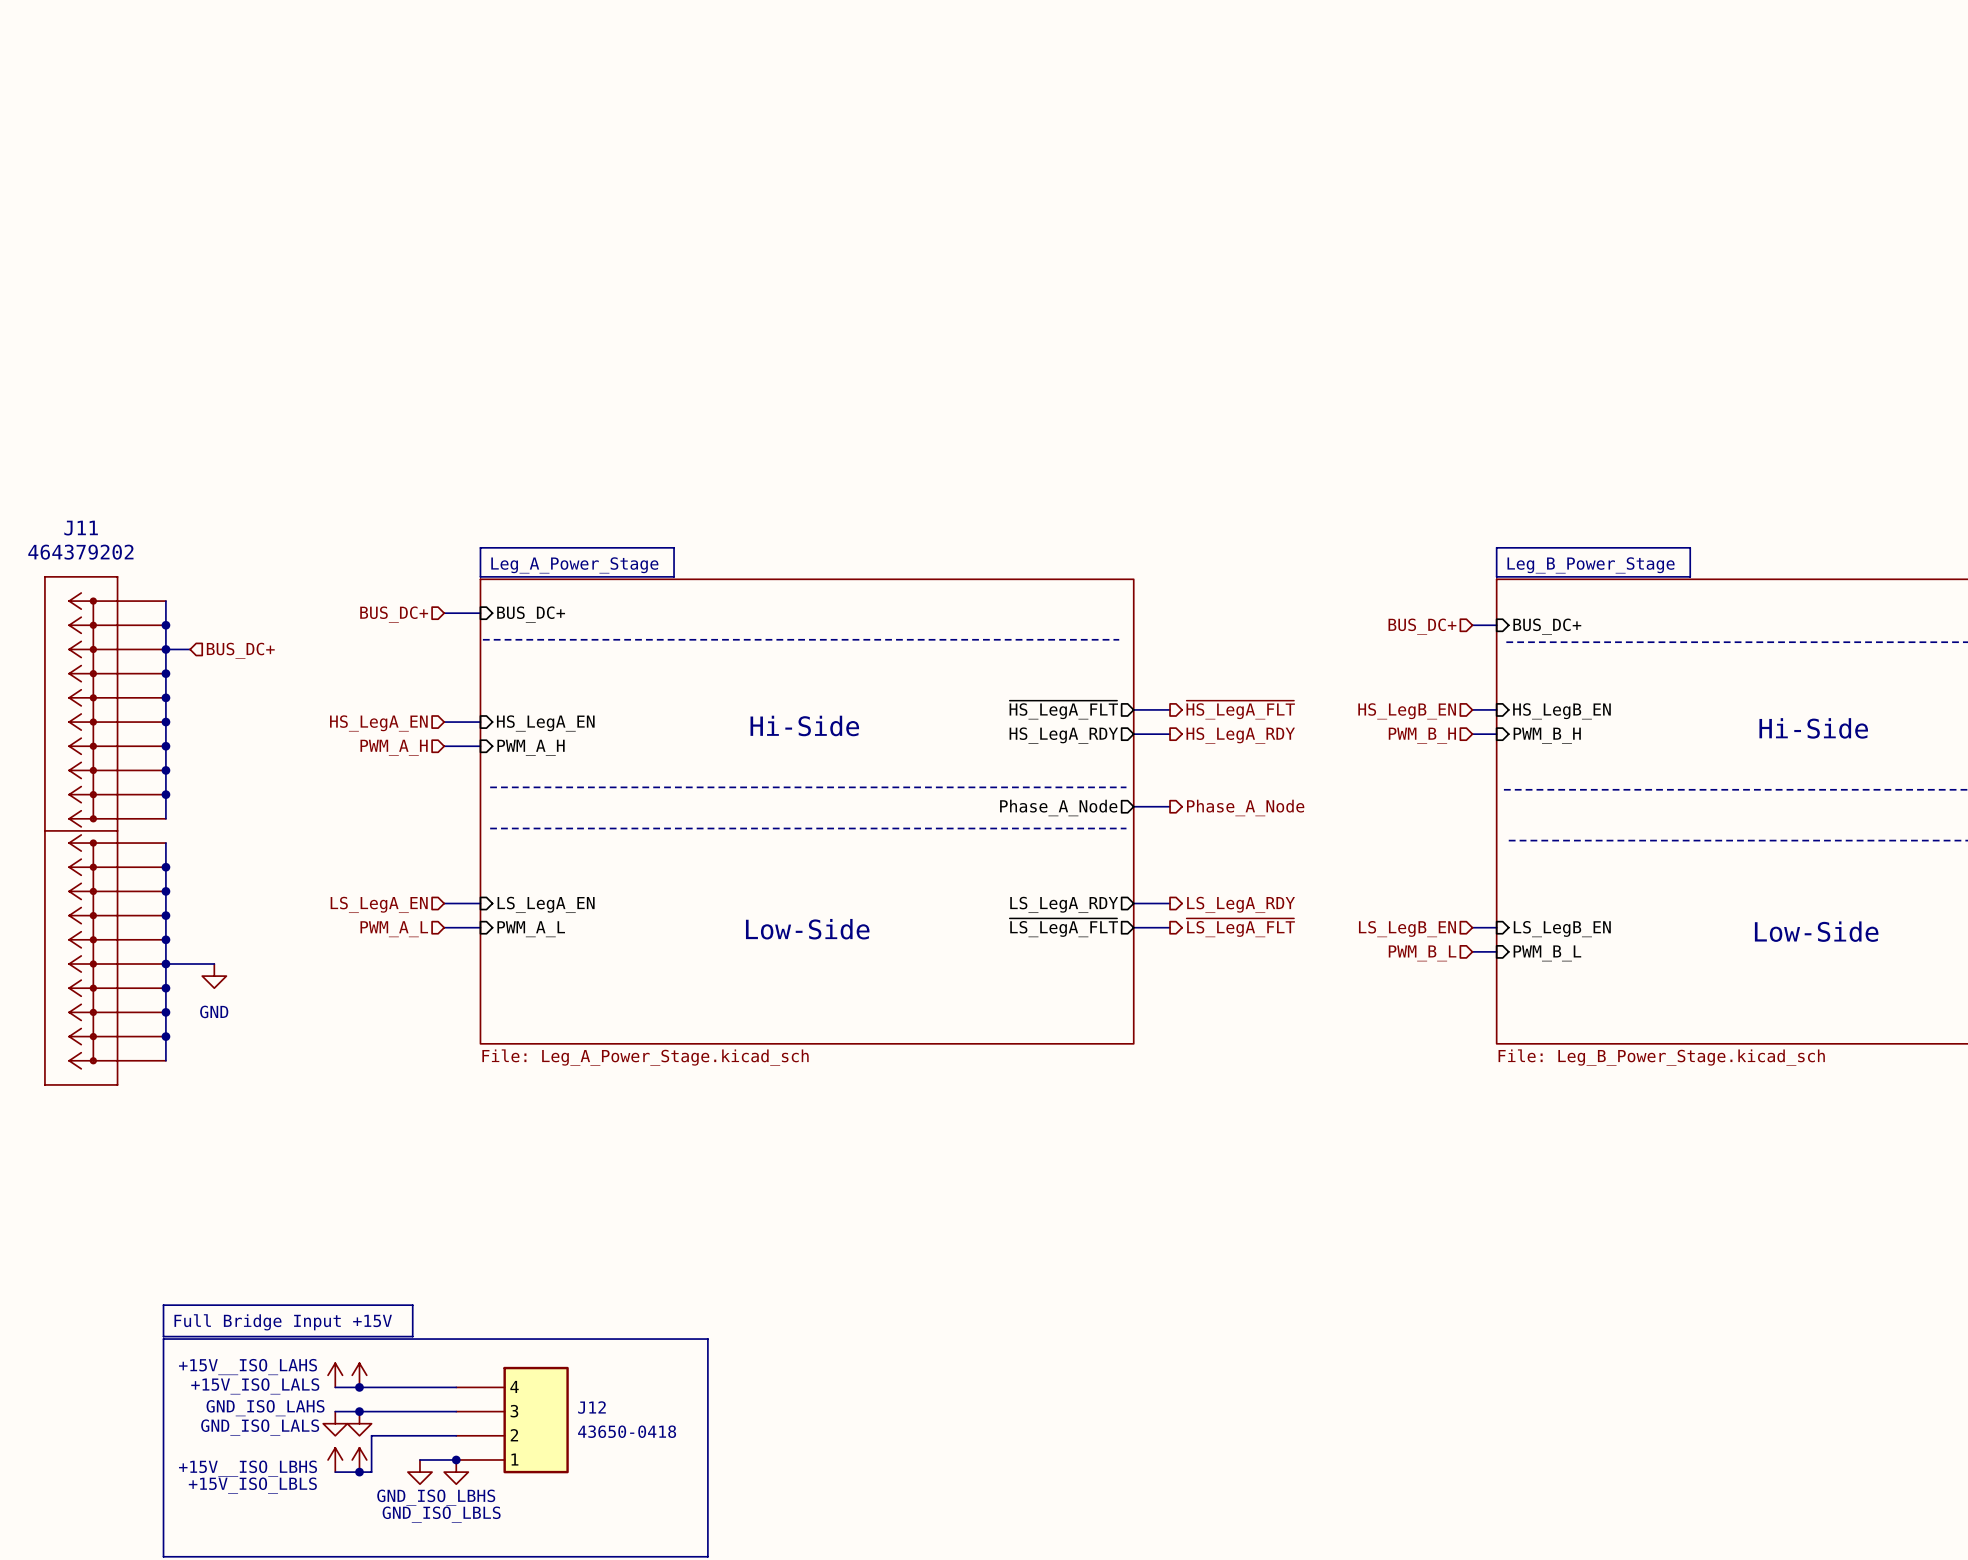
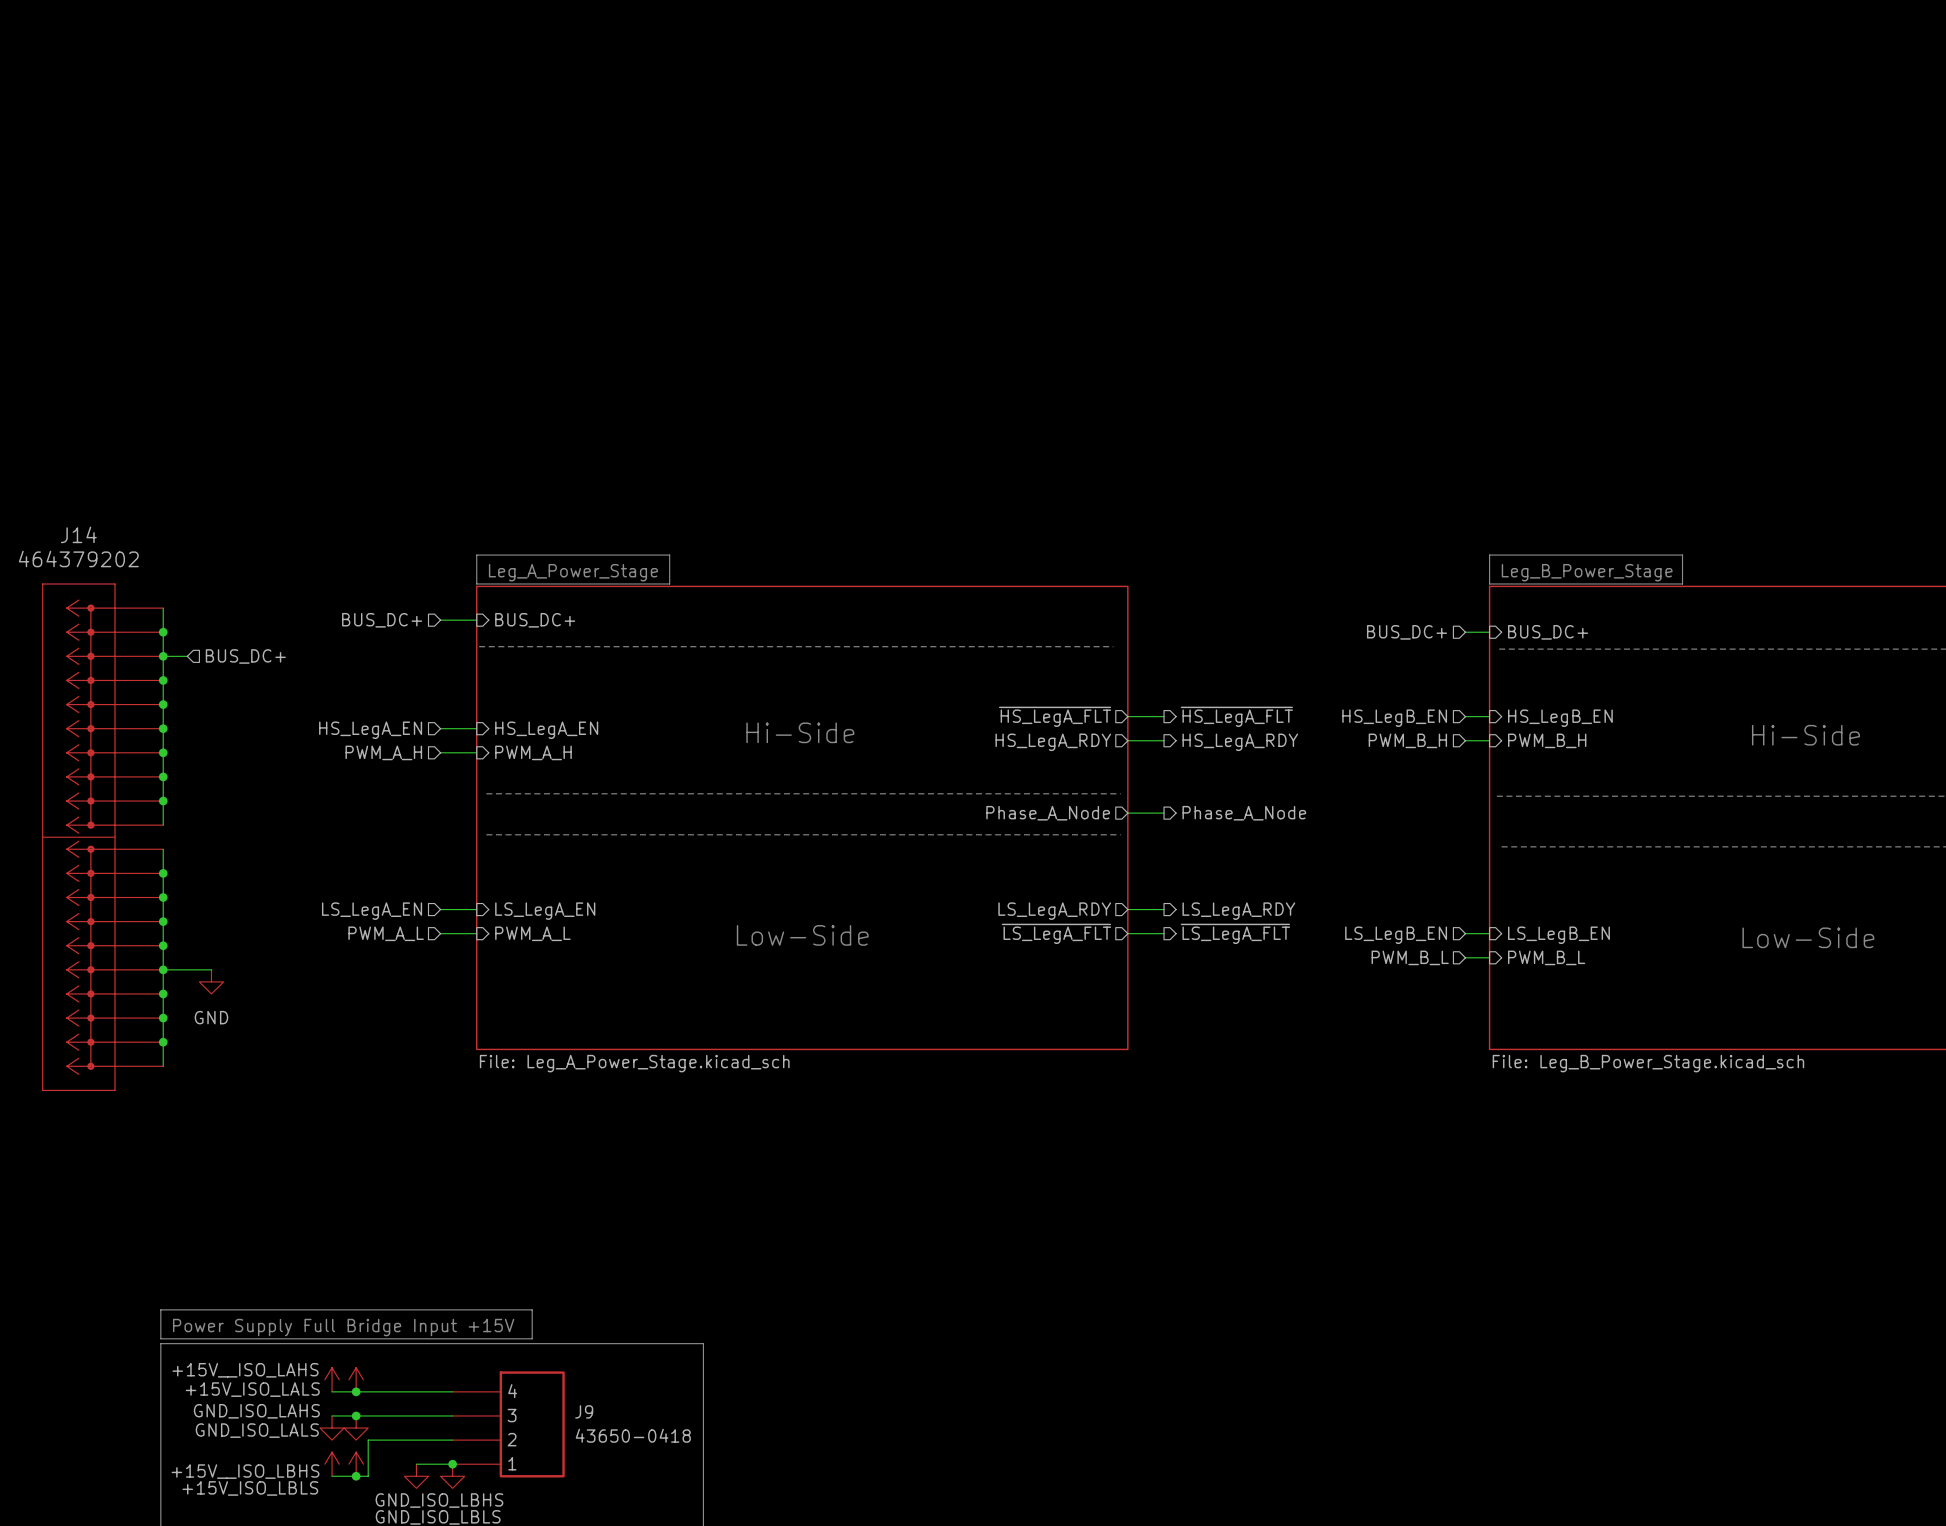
J11 name: J11 (81, 528) -> J14 (78, 534)
line: (412, 1305) (412, 1336) (163, 1336) (163, 1334) -> (409, 1309) (532, 1309) (532, 1338) (160, 1338)
text: Full Bridge Input +15V (283, 1322) -> Power Supply Full Bridge Input +15V (343, 1327)
J12 name: J12 (591, 1407) -> J9 (584, 1411)

